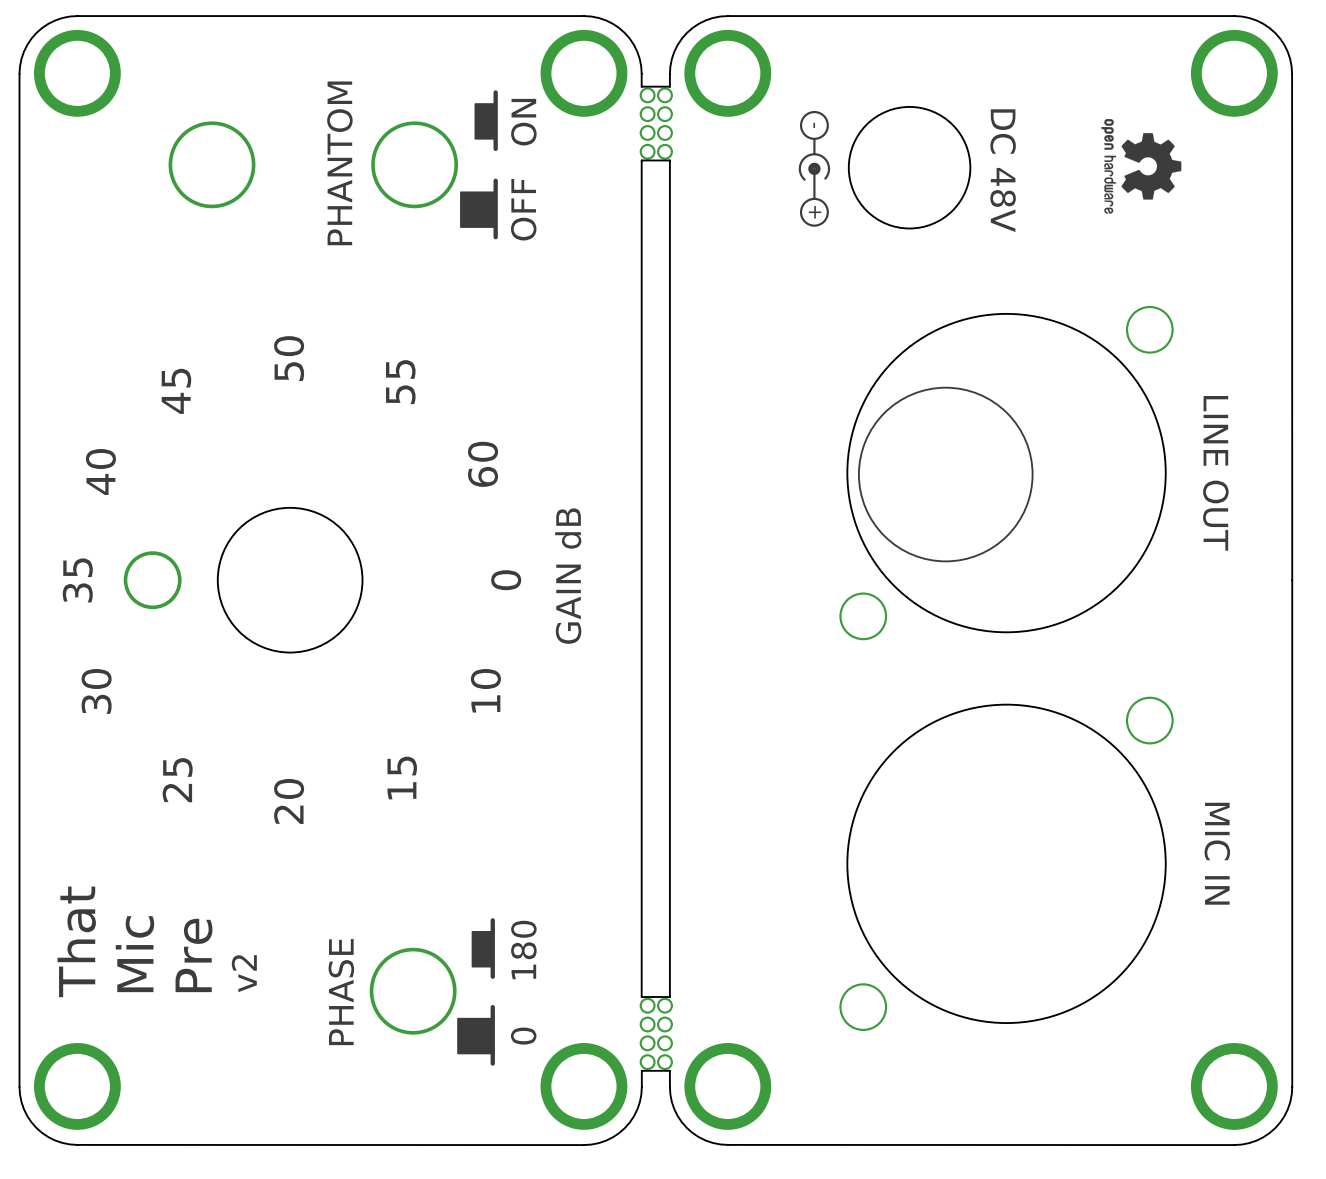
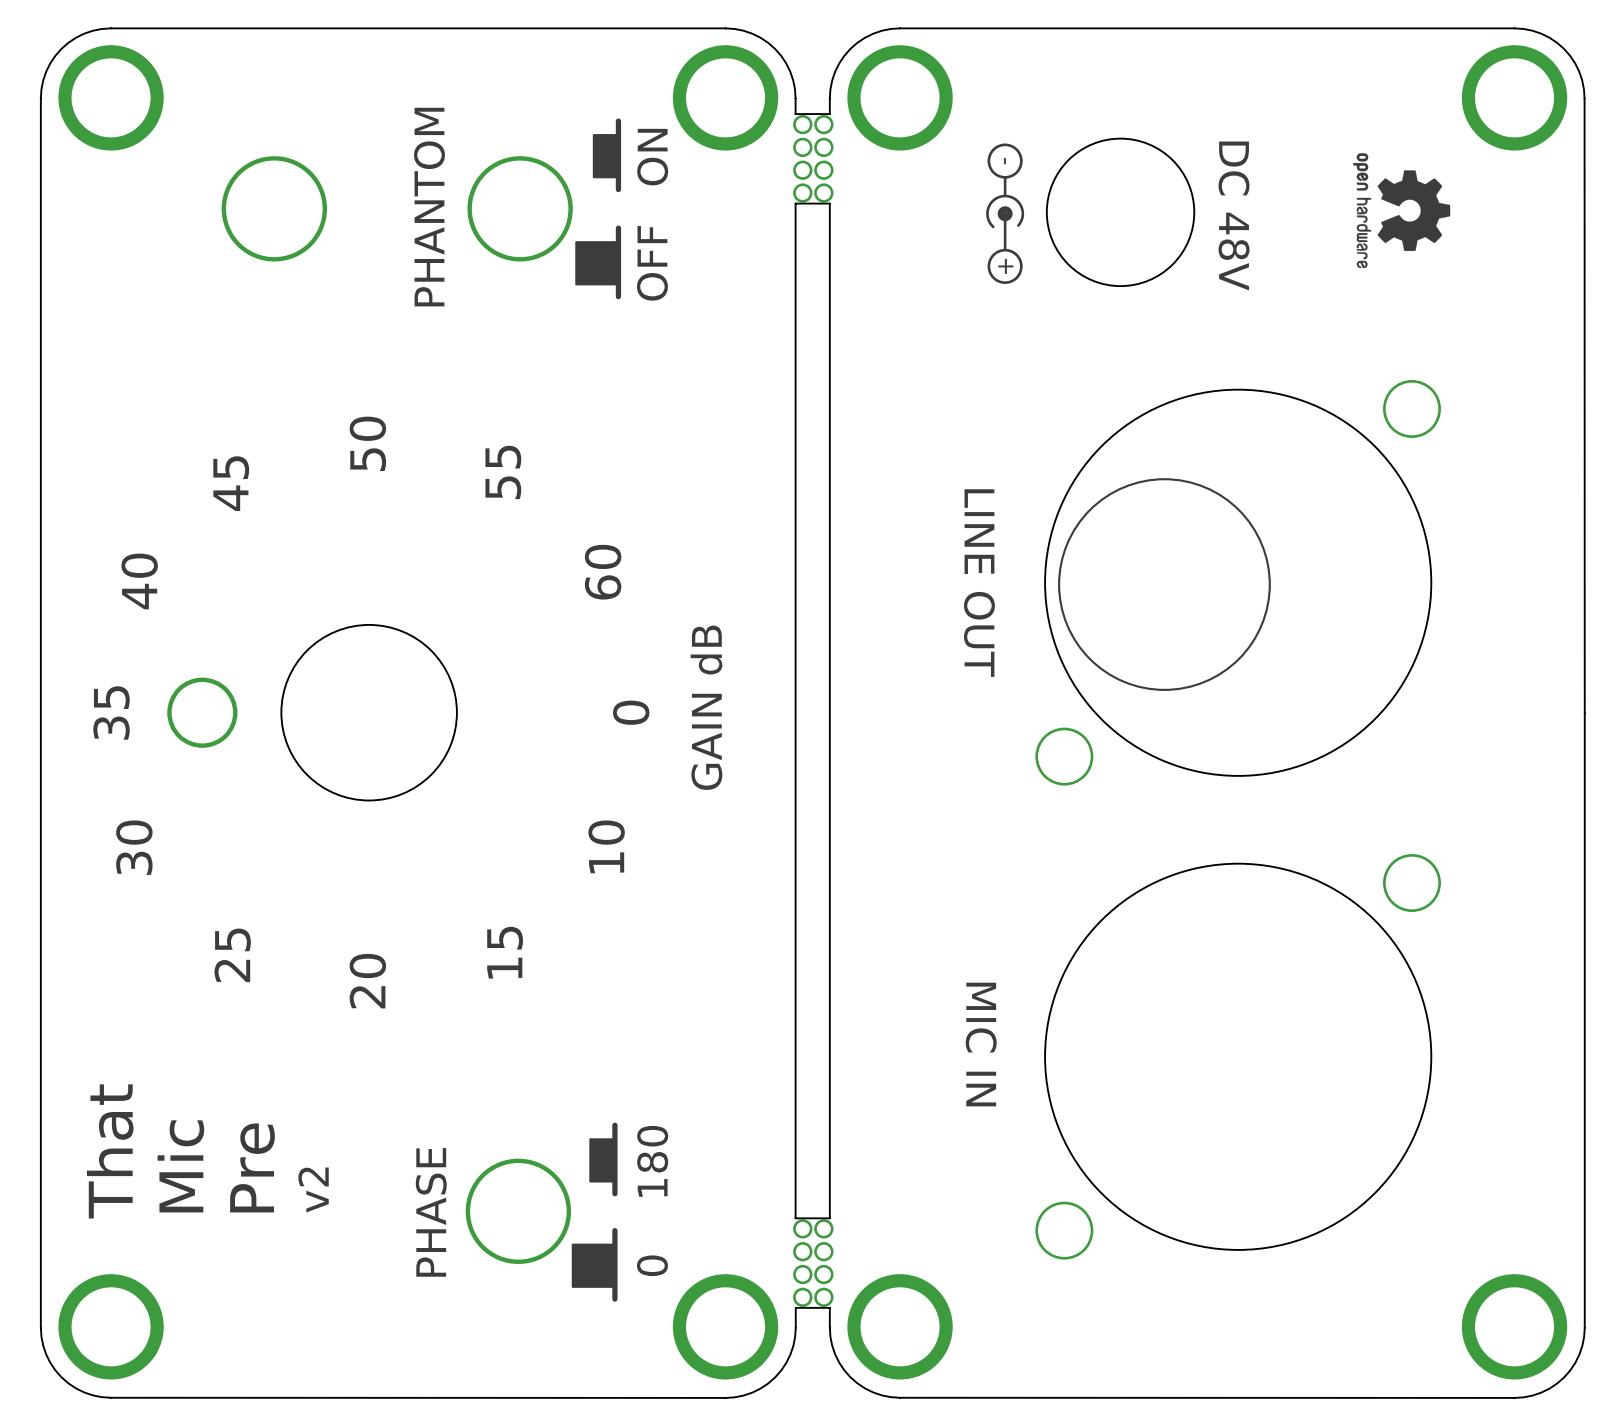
text: none -> LINE OUT (979, 583)
text: LINE OUT (1215, 473) -> none
text: none -> MIC IN (981, 1044)
text: MIC IN (1217, 853) -> none

